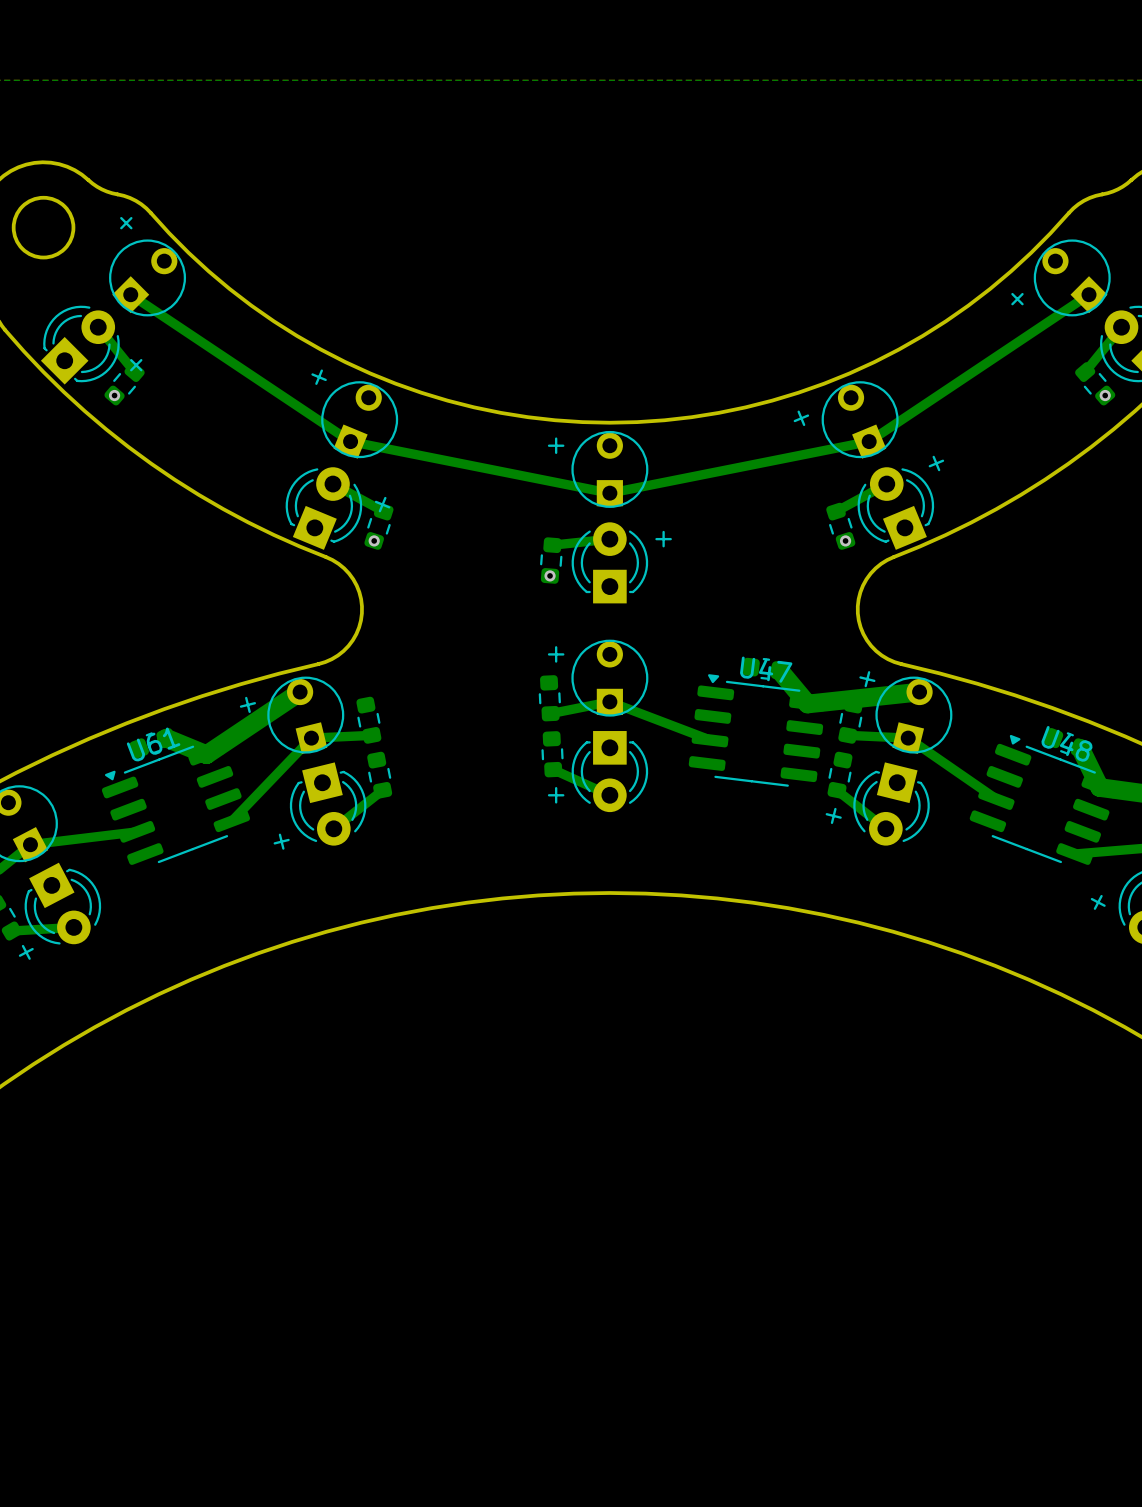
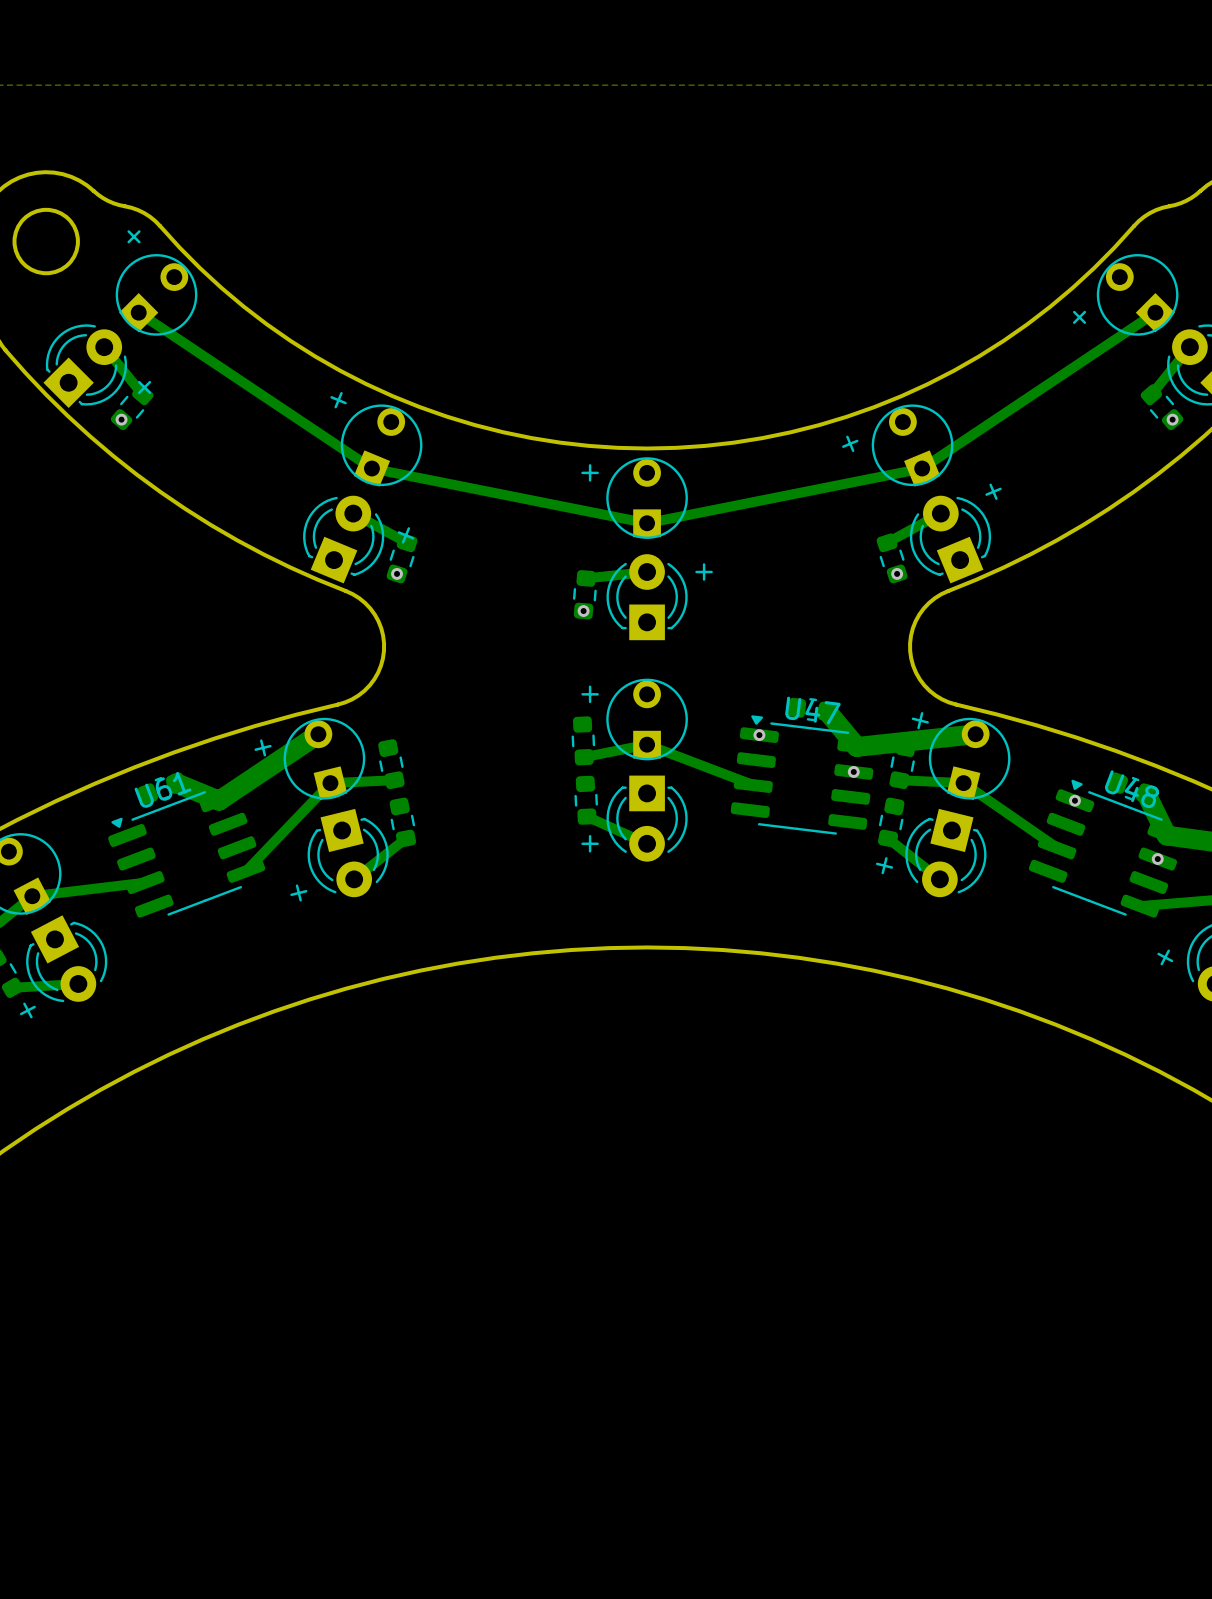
via: none -> (759, 735)
via: none -> (853, 771)
via: none -> (1074, 800)
via: none -> (1157, 859)

